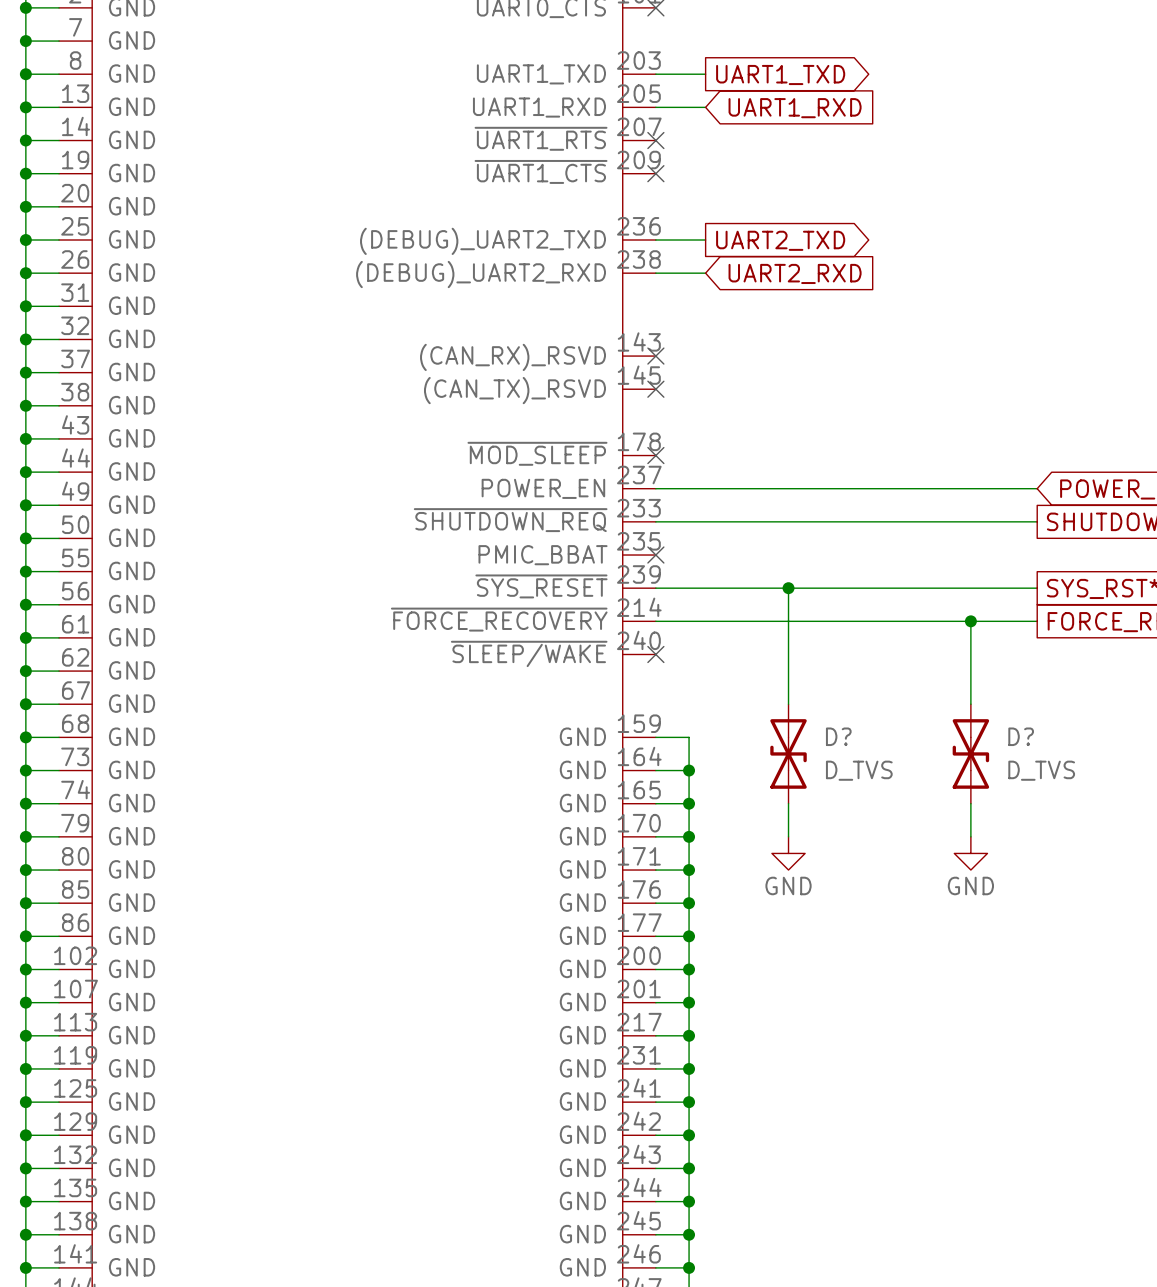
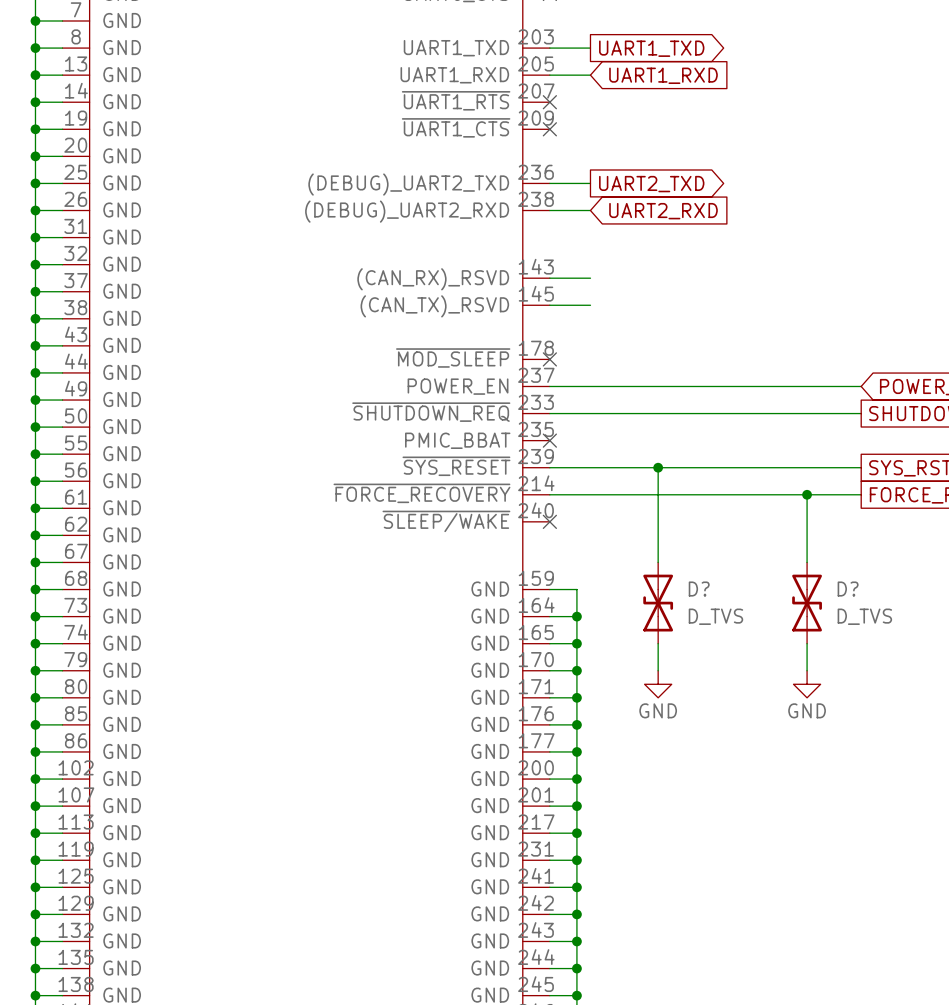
wire: none -> (549, 278) (590, 278)
no-connect mark: (655, 356) -> none
wire: none -> (549, 305) (590, 305)
no-connect mark: (655, 389) -> none

